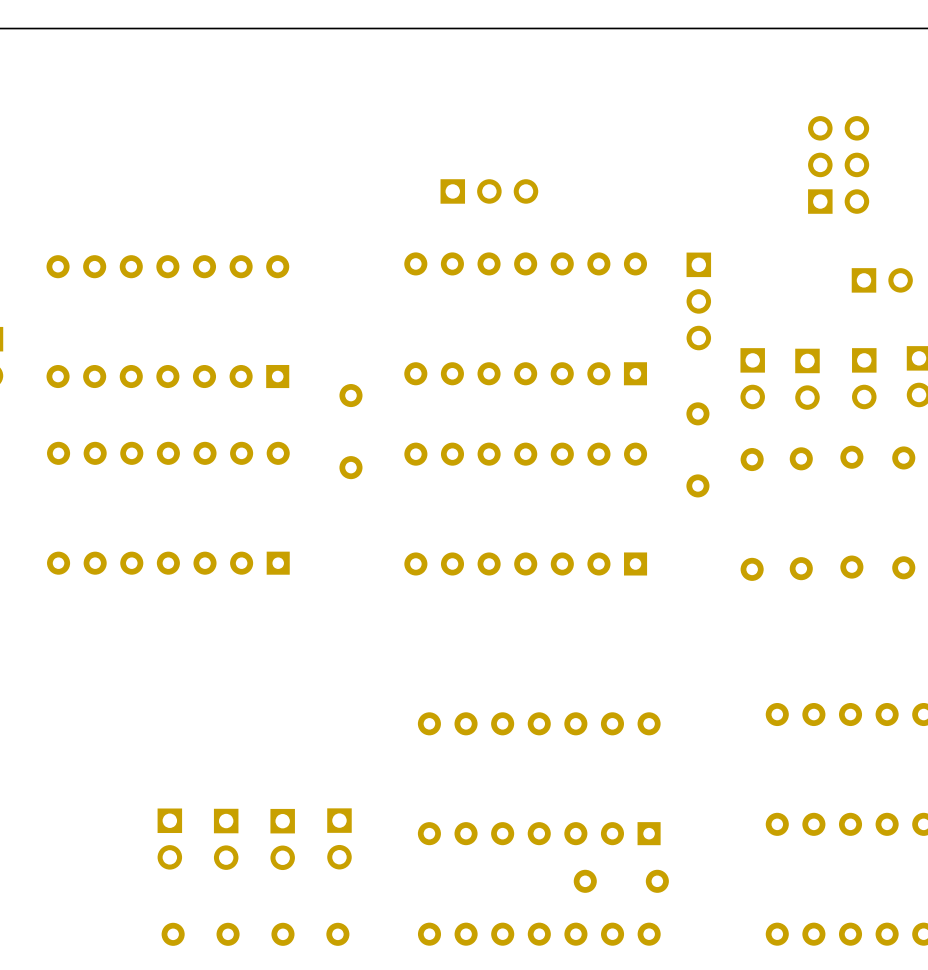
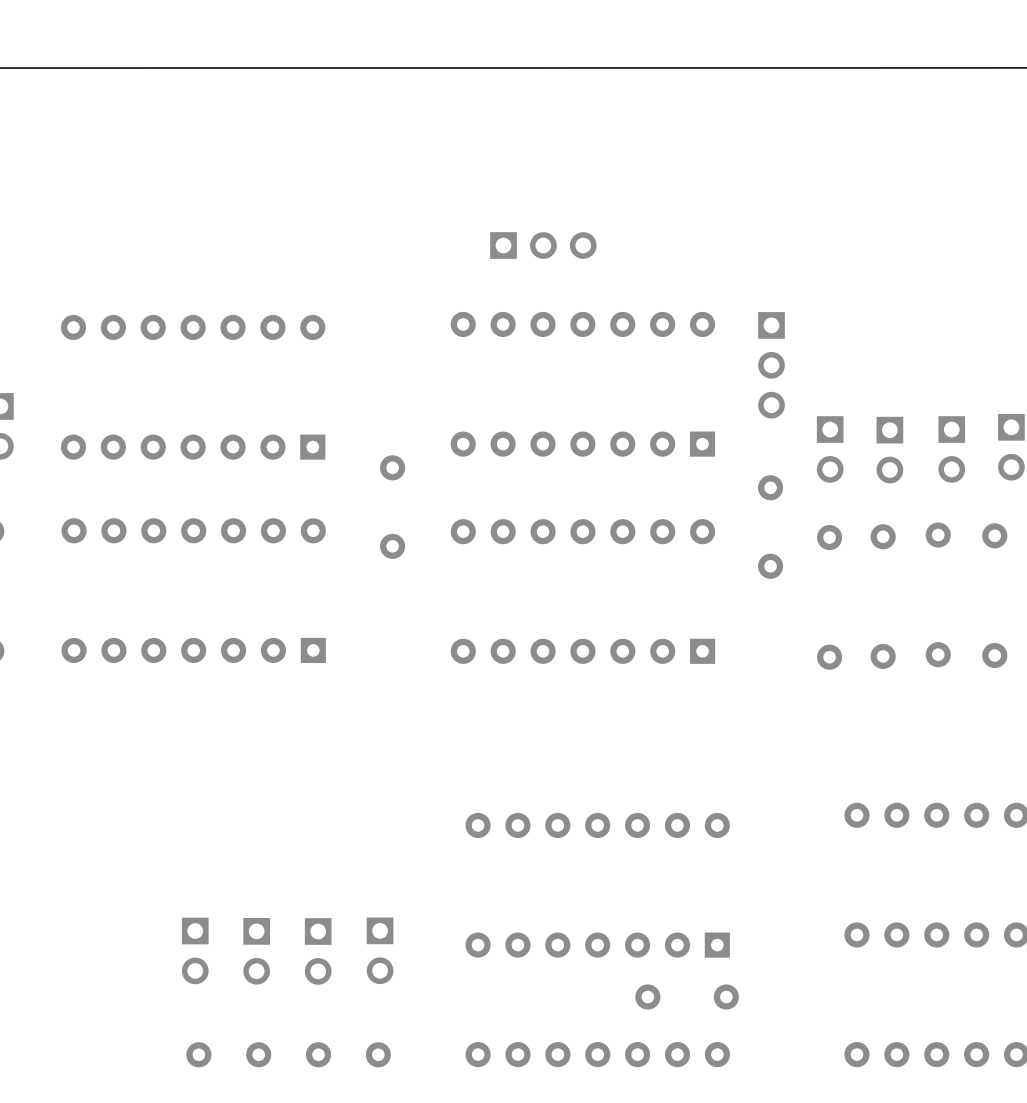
part: (838, 164) -> none
part: (882, 280) -> none

